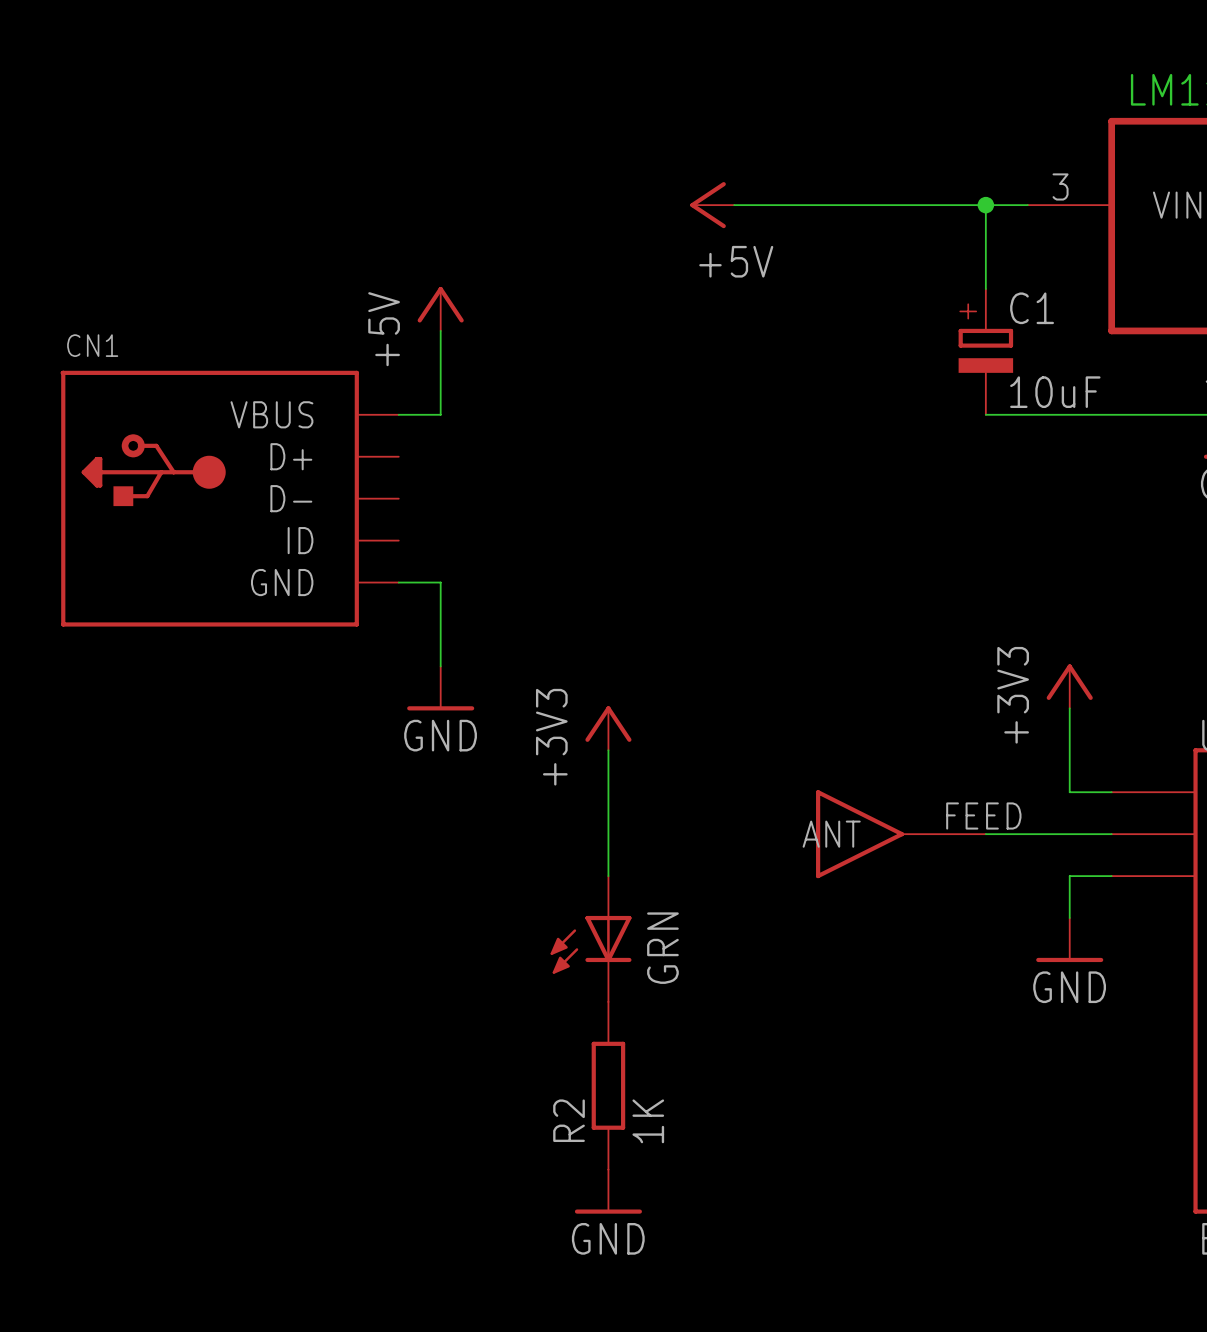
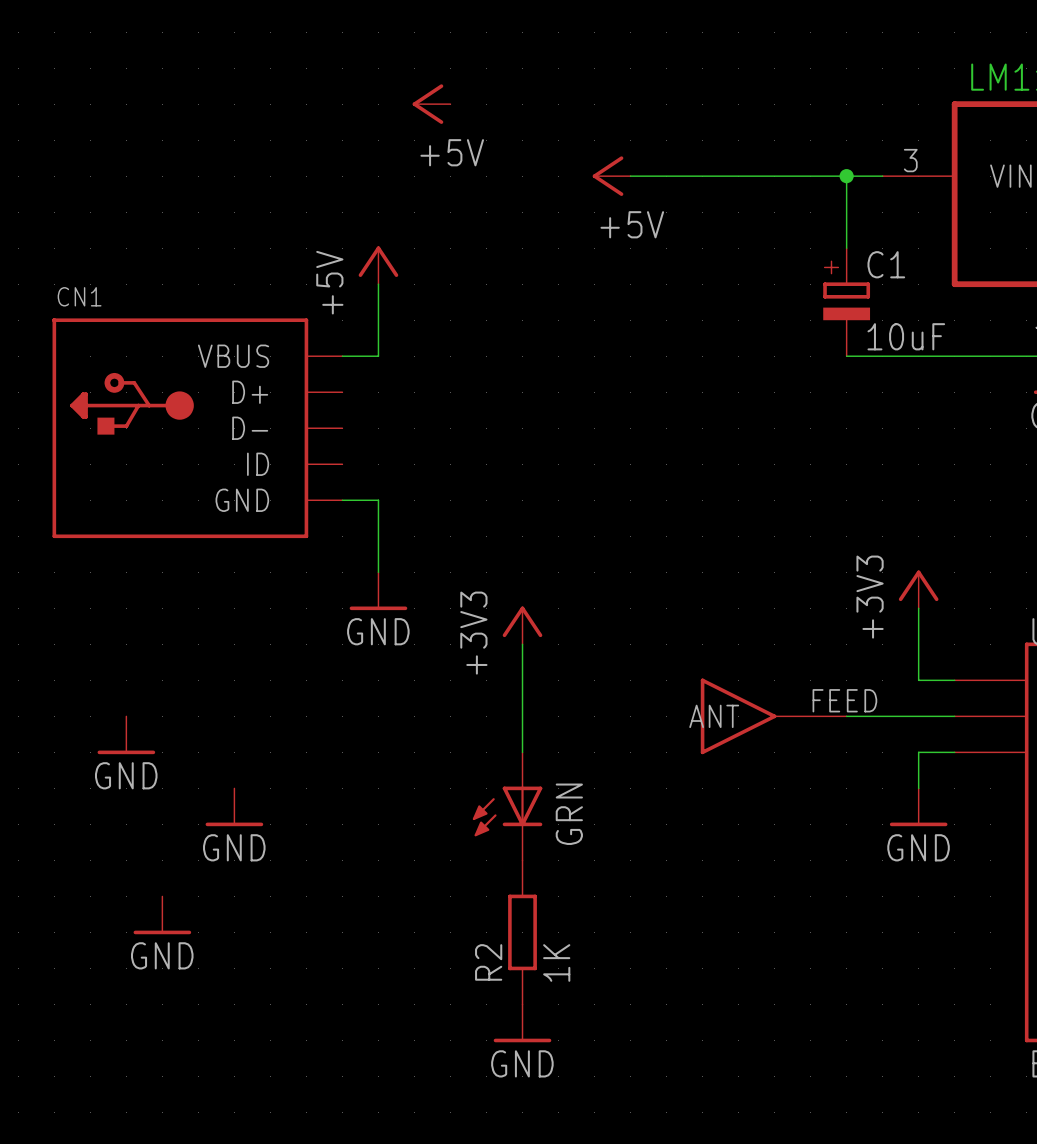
power symbol: none -> +5V (431, 104)
power symbol: none -> GND (126, 735)
power symbol: none -> GND (234, 807)
power symbol: none -> GND (162, 915)

